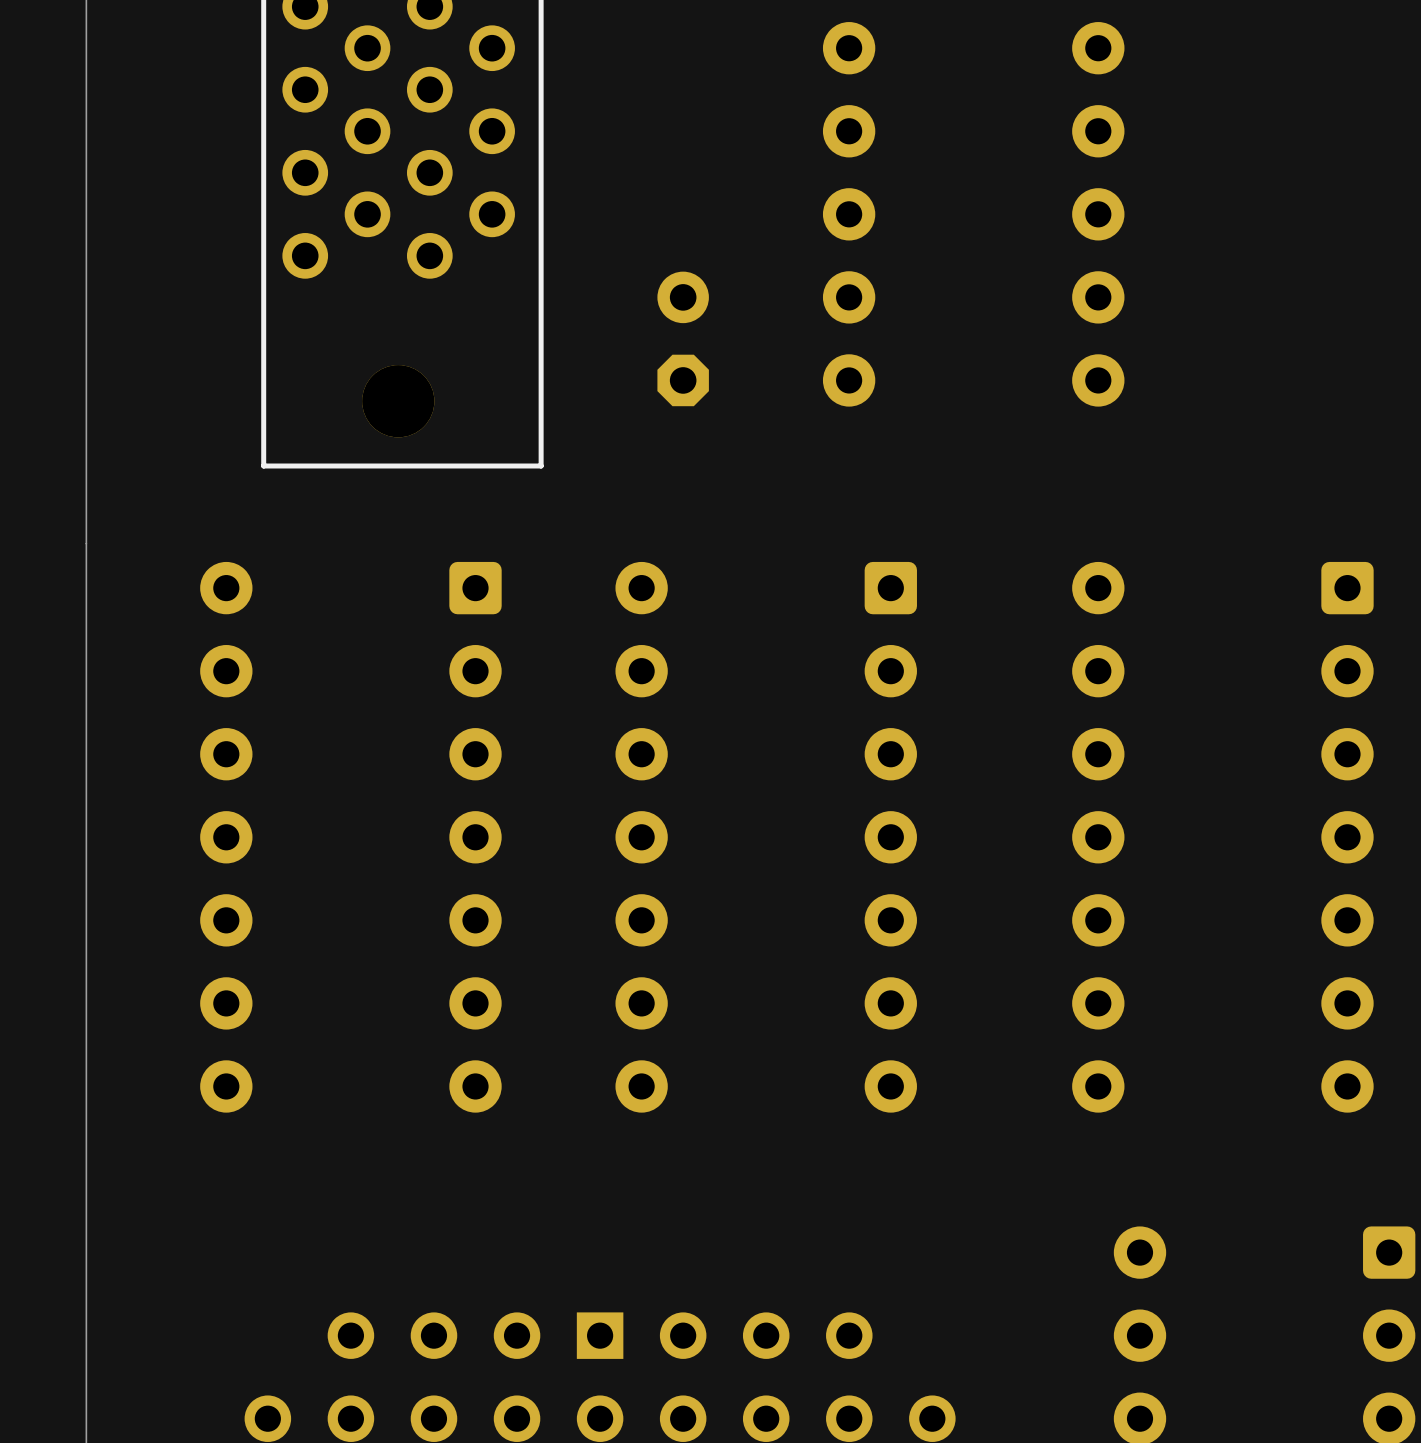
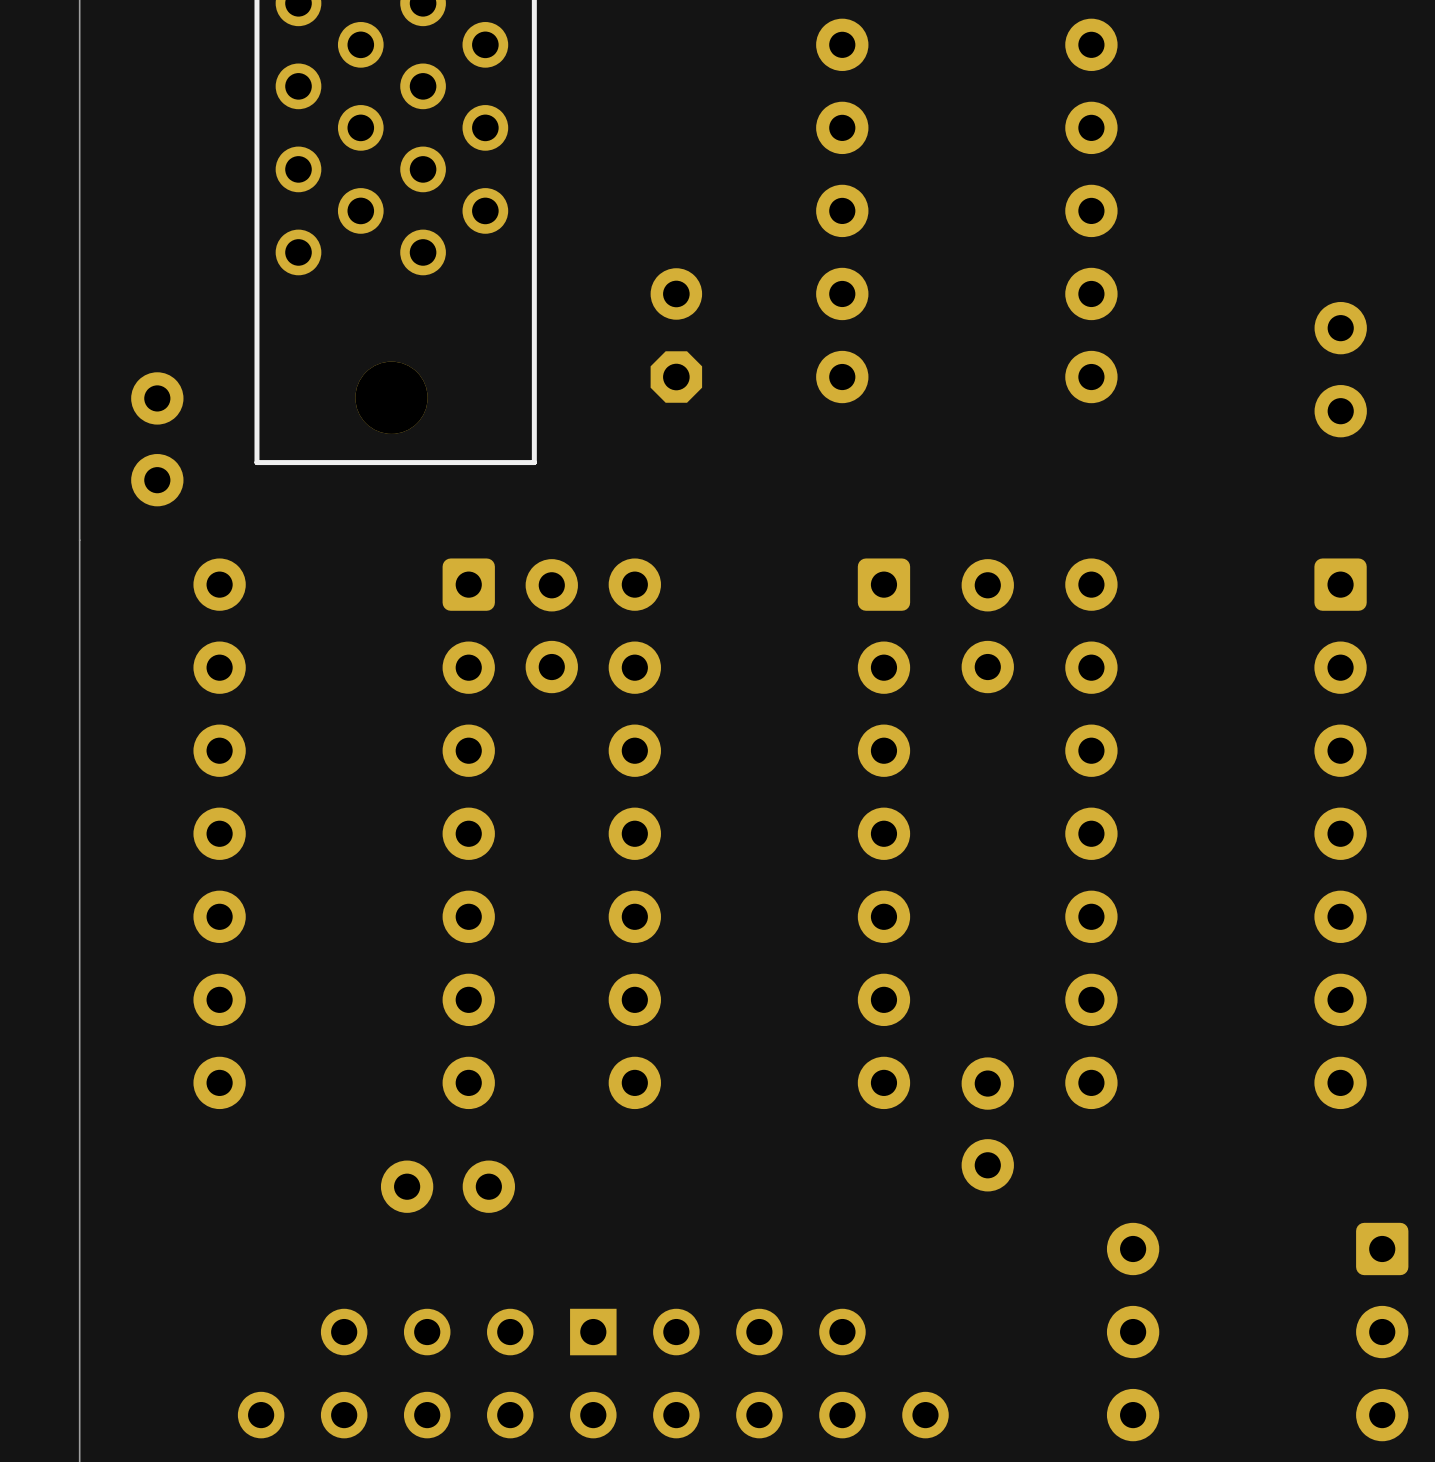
part: none -> (1340, 369)
part: none -> (157, 439)
part: none -> (551, 626)
part: none -> (987, 626)
part: none -> (987, 1124)
part: none -> (447, 1186)

